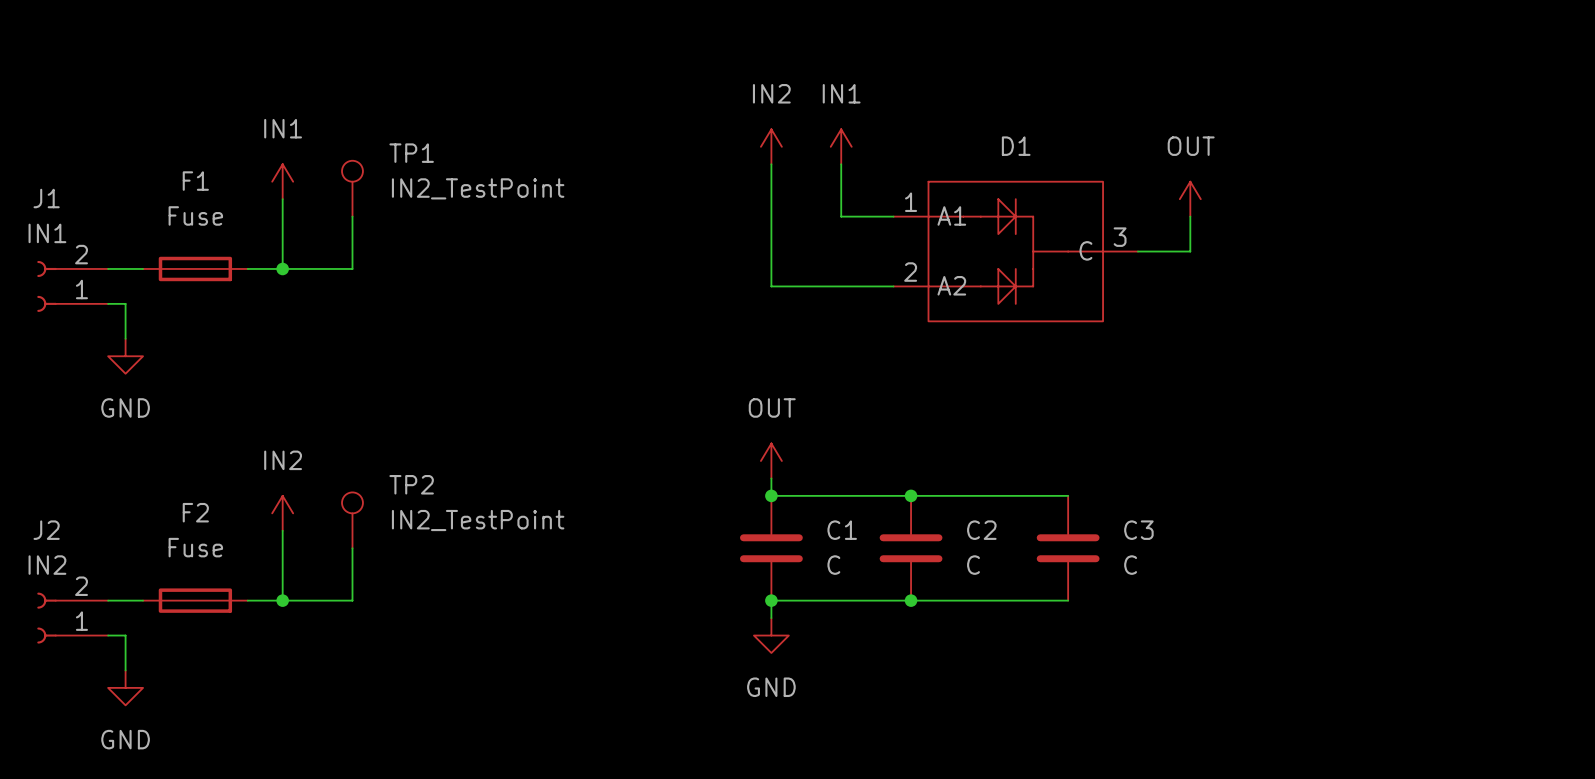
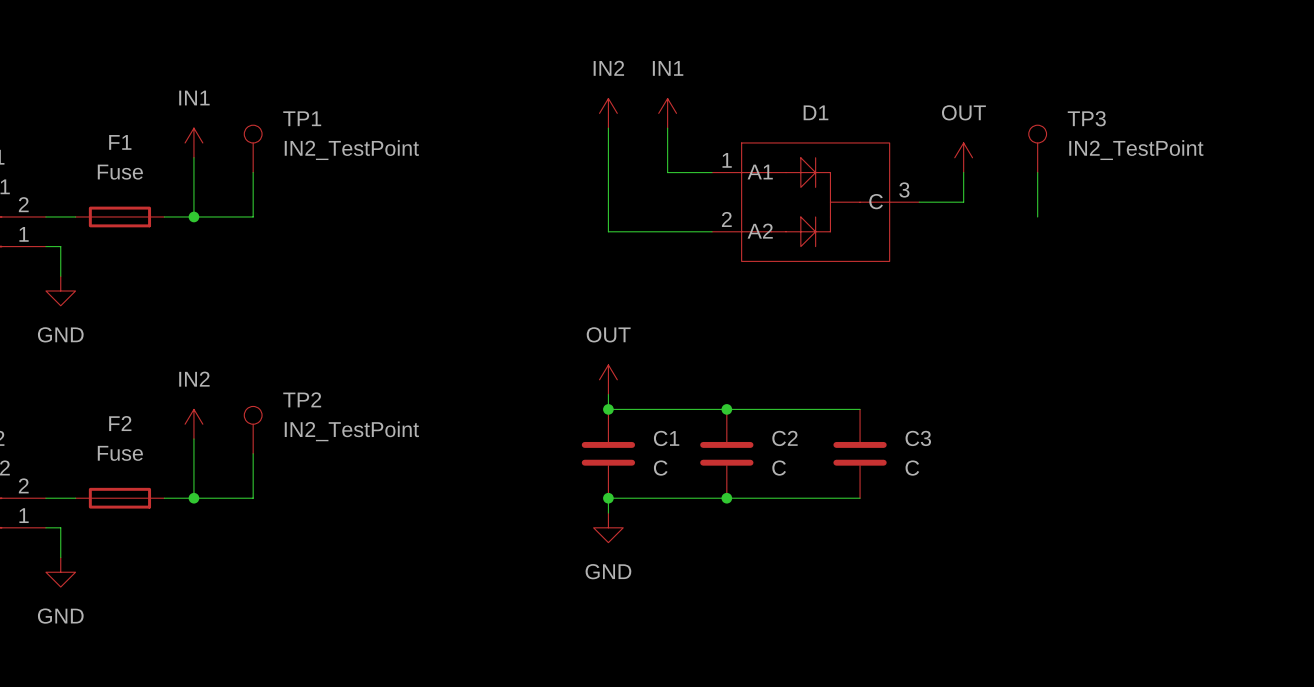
TP3: none -> IN2_TestPoint (1037, 148)
wire: none -> (1037, 172) (1037, 216)

